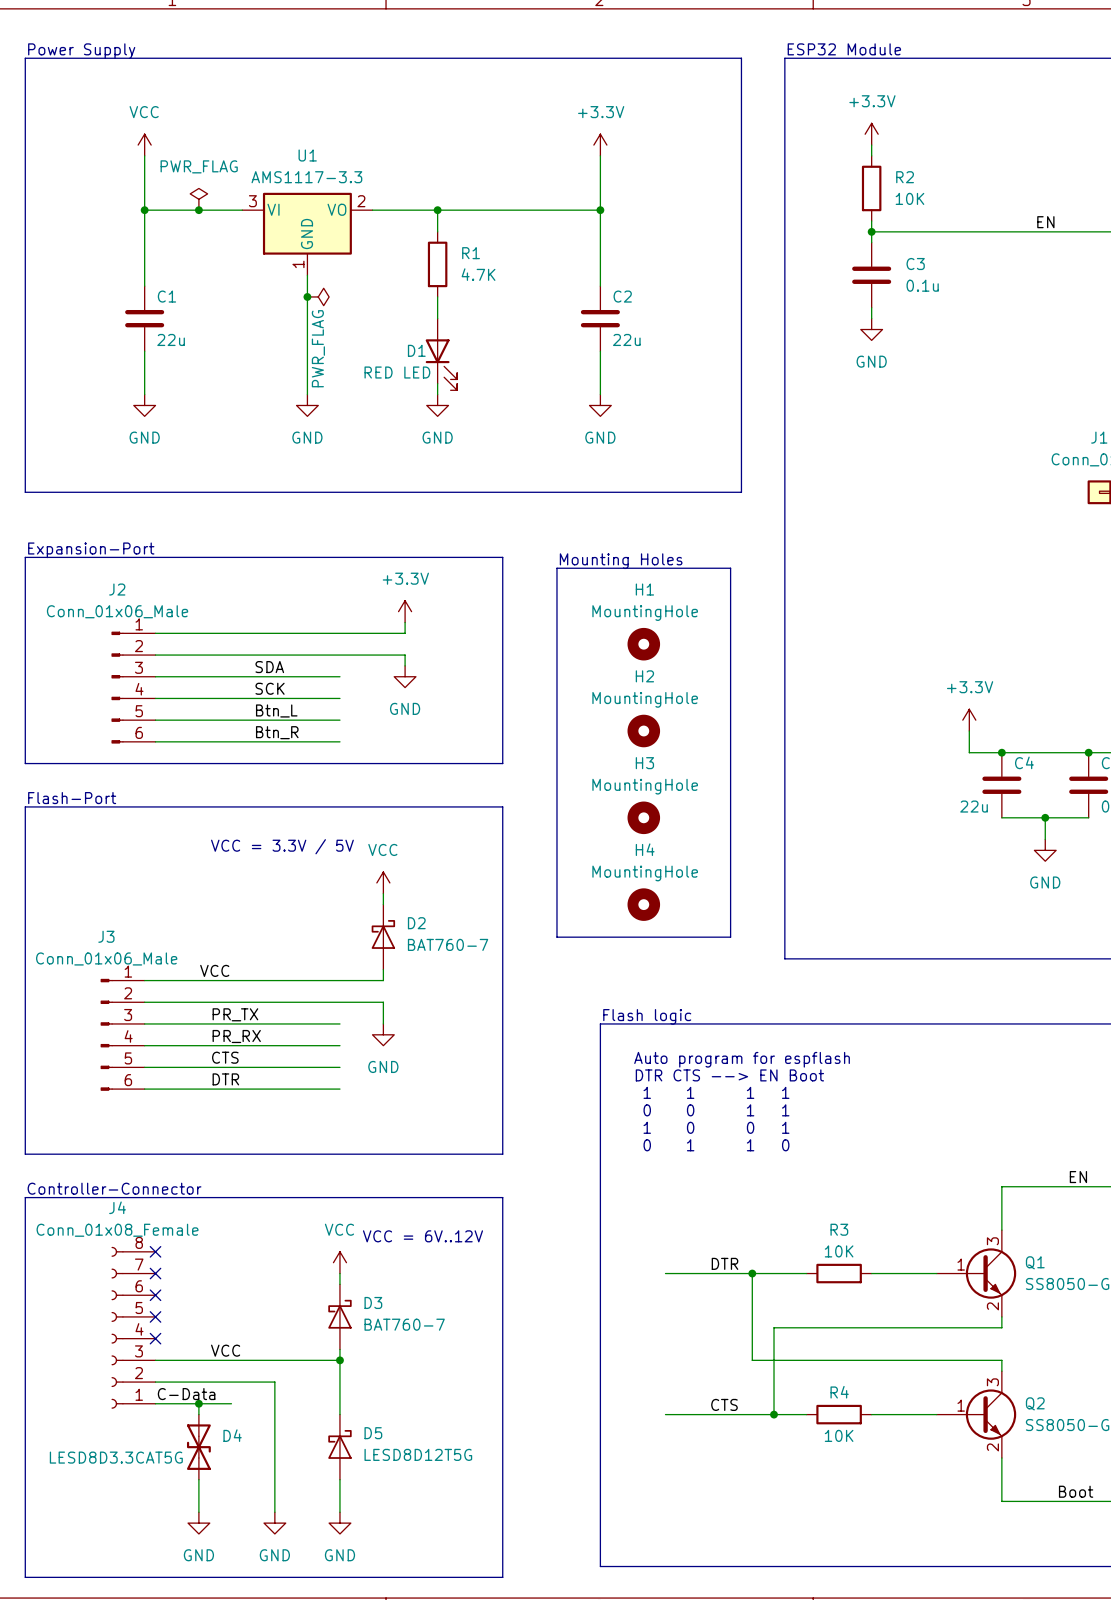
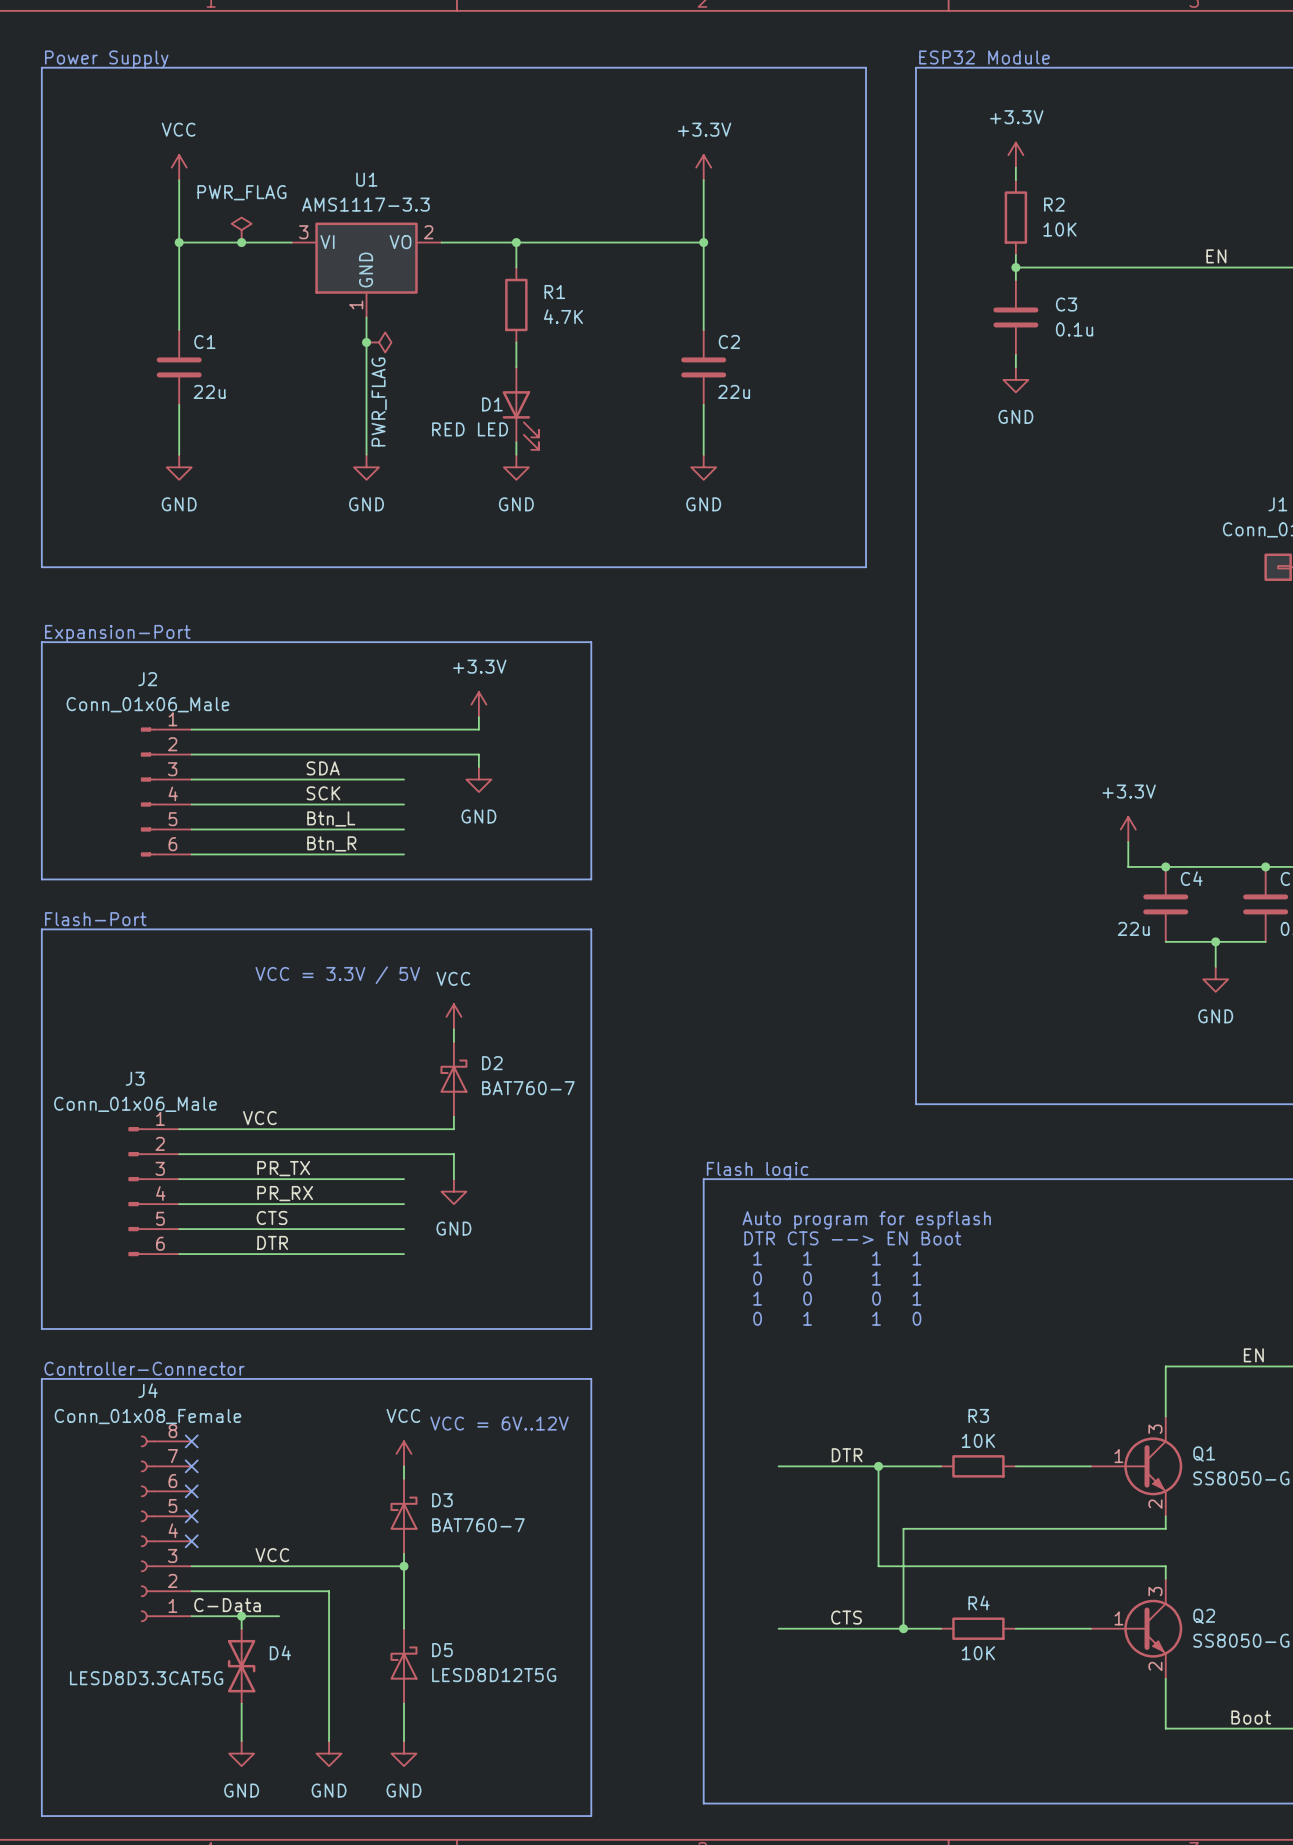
text: Mounting Holes (621, 561) -> none
line: (556, 568) (556, 937) (730, 937) (730, 568) (556, 568) -> none
H1: MountingHole (643, 644) -> none
H2: MountingHole (643, 731) -> none
H3: MountingHole (643, 817) -> none
H4: MountingHole (643, 904) -> none

